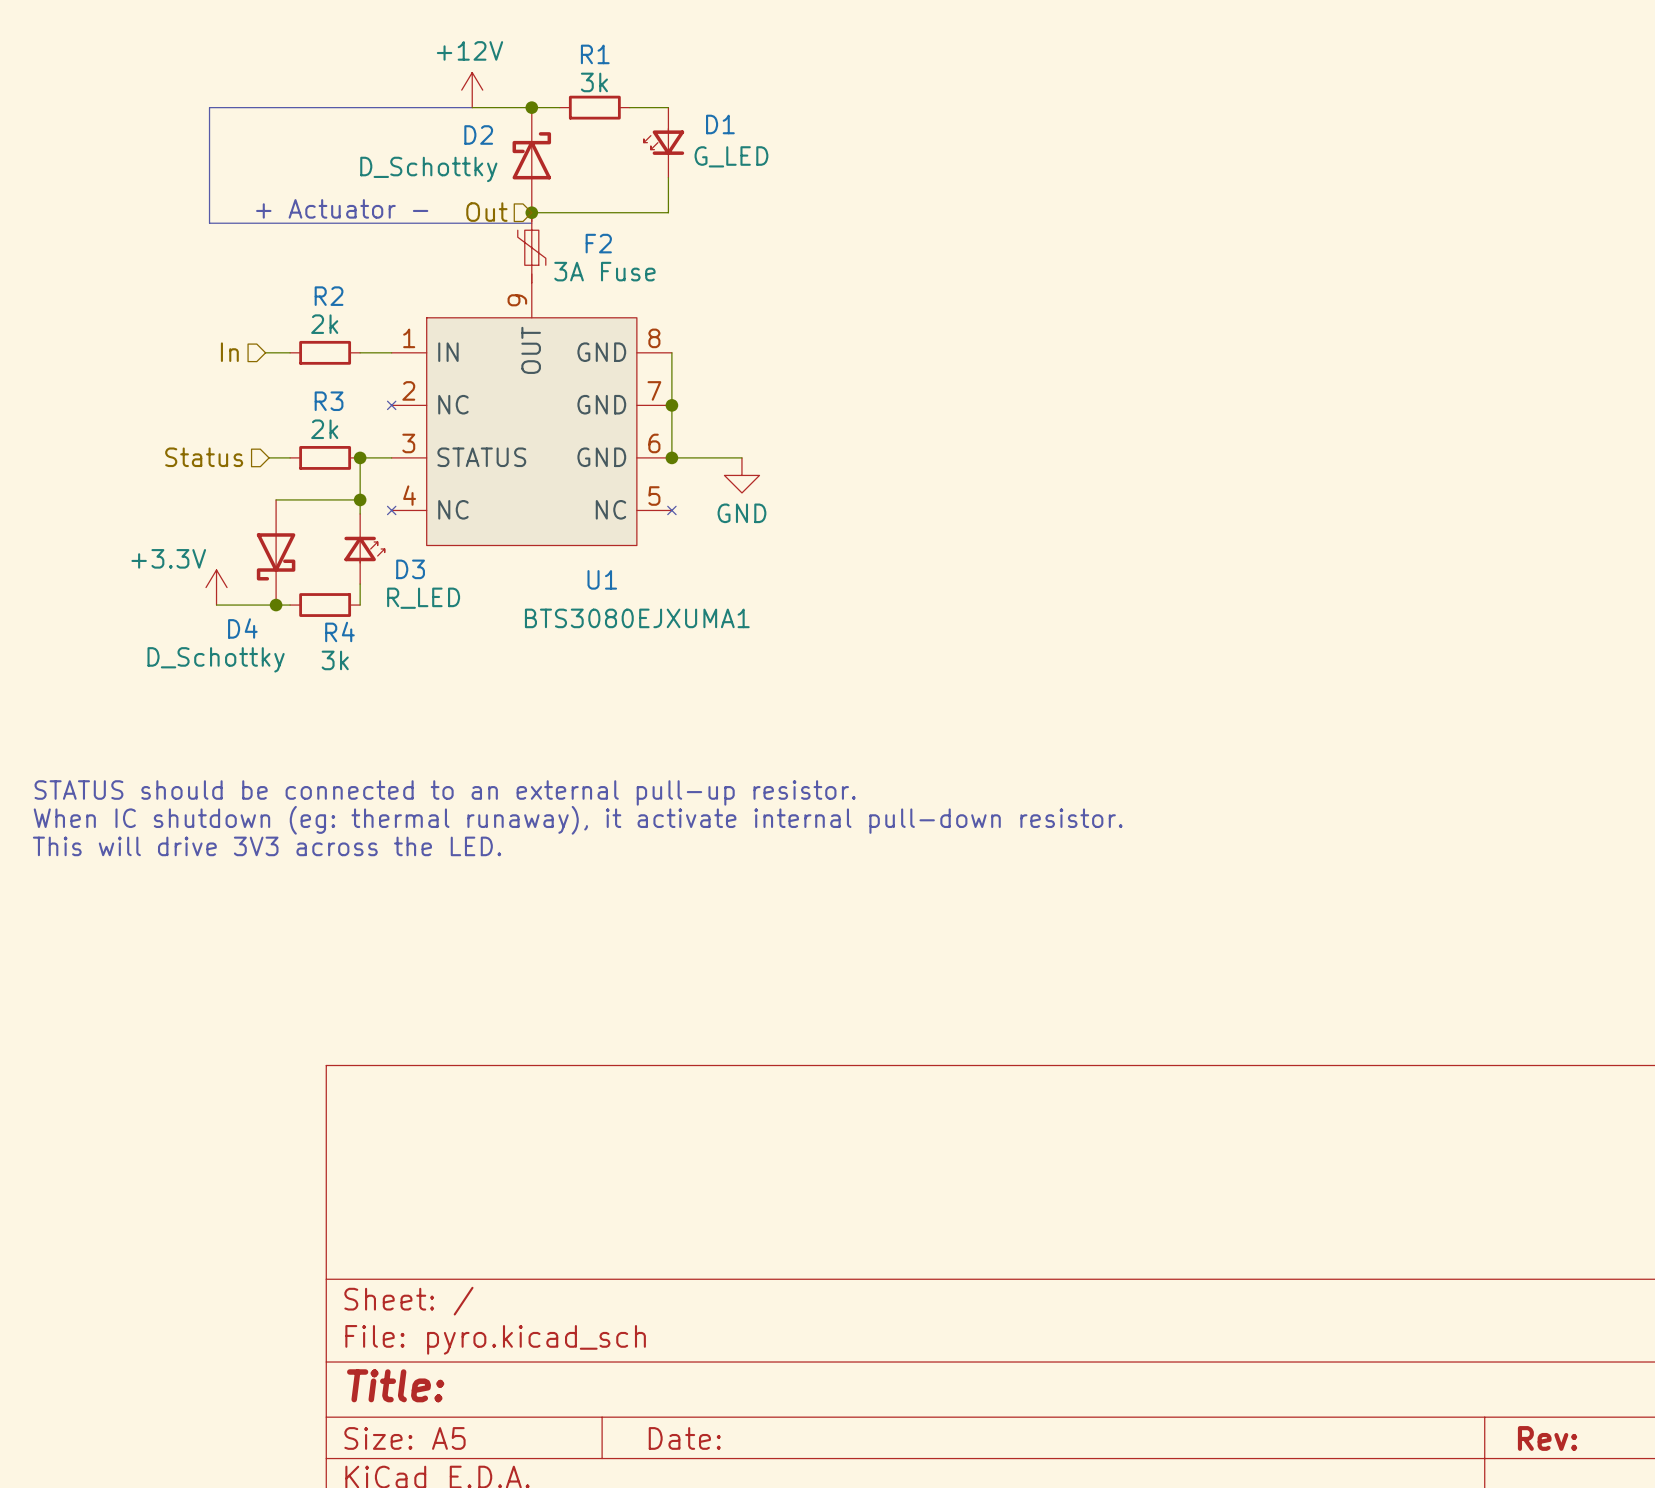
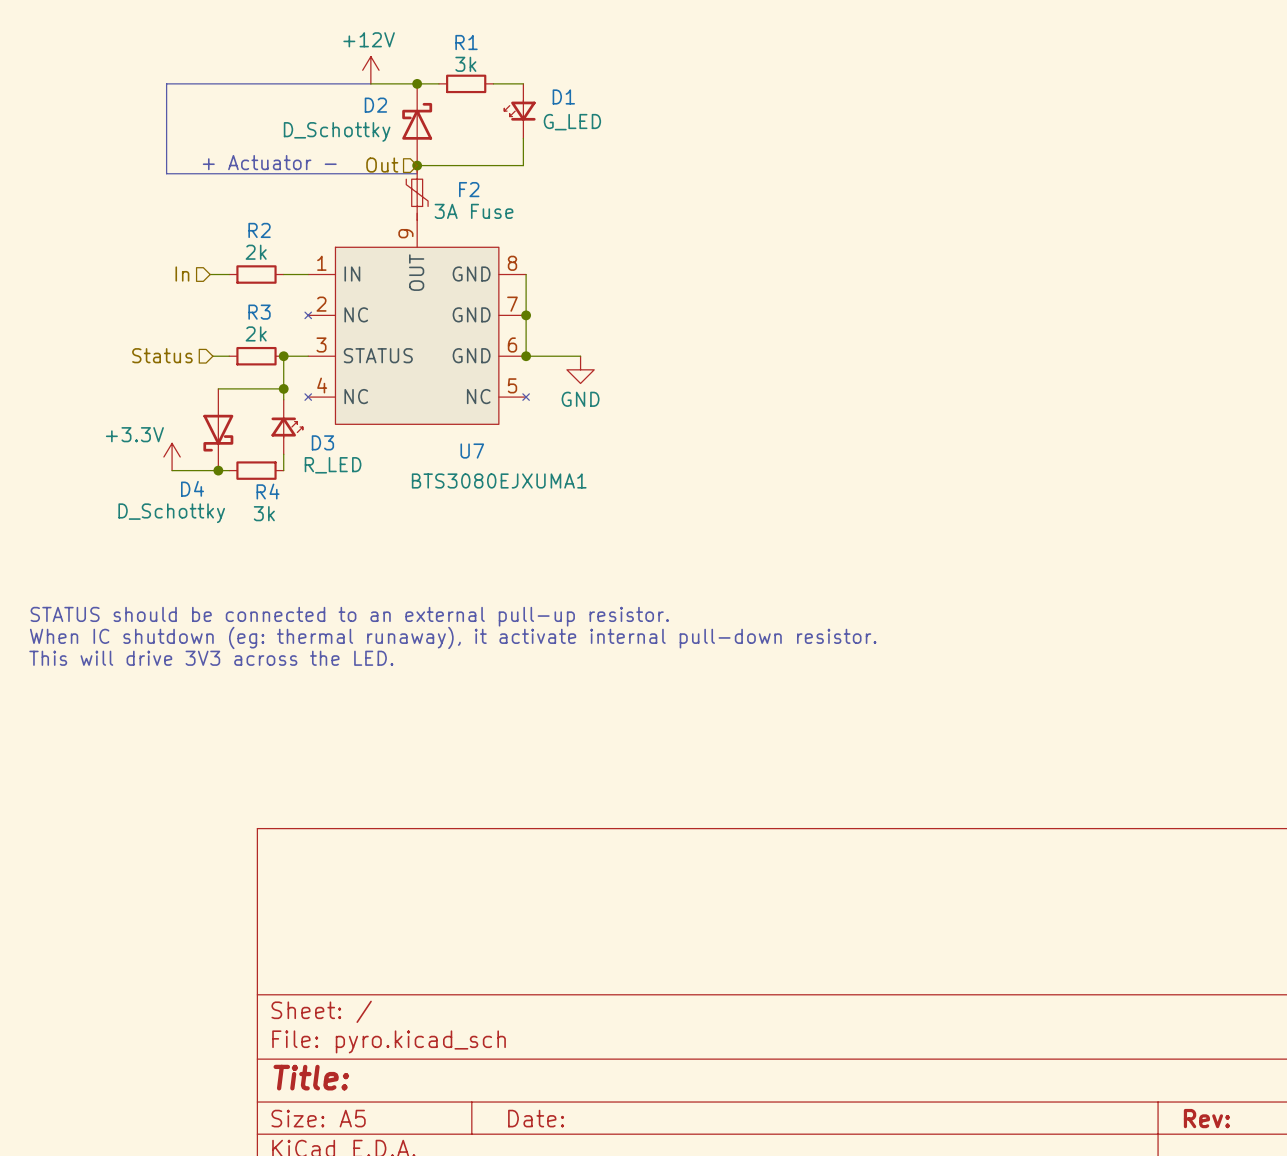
U1 name: U1 (602, 579) -> U7 (472, 451)

